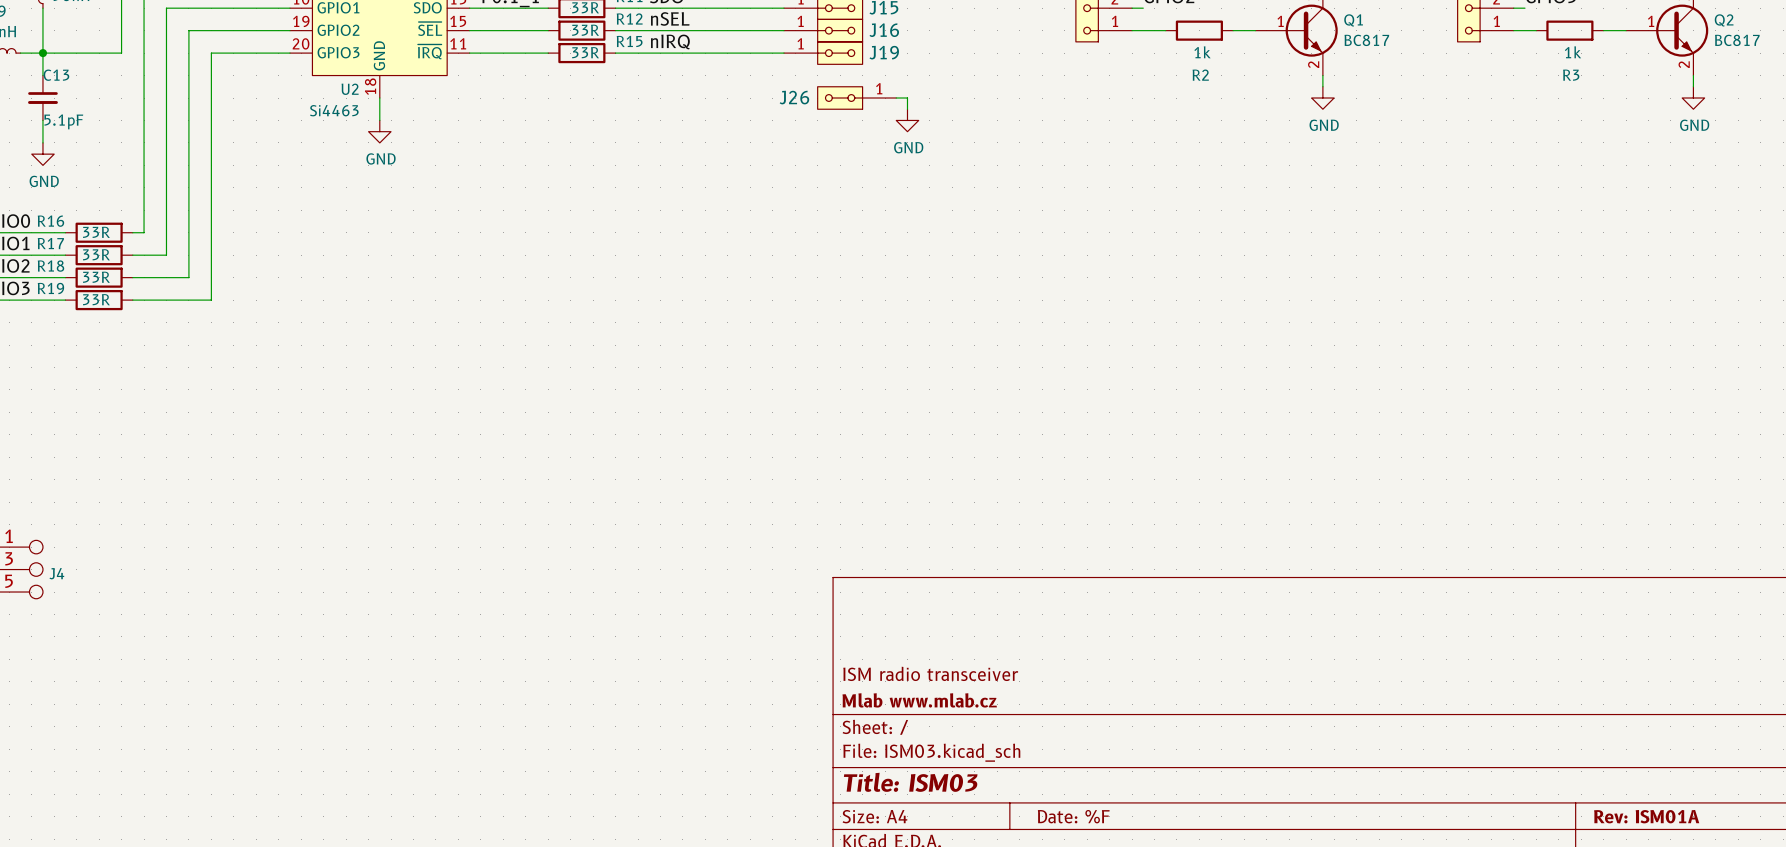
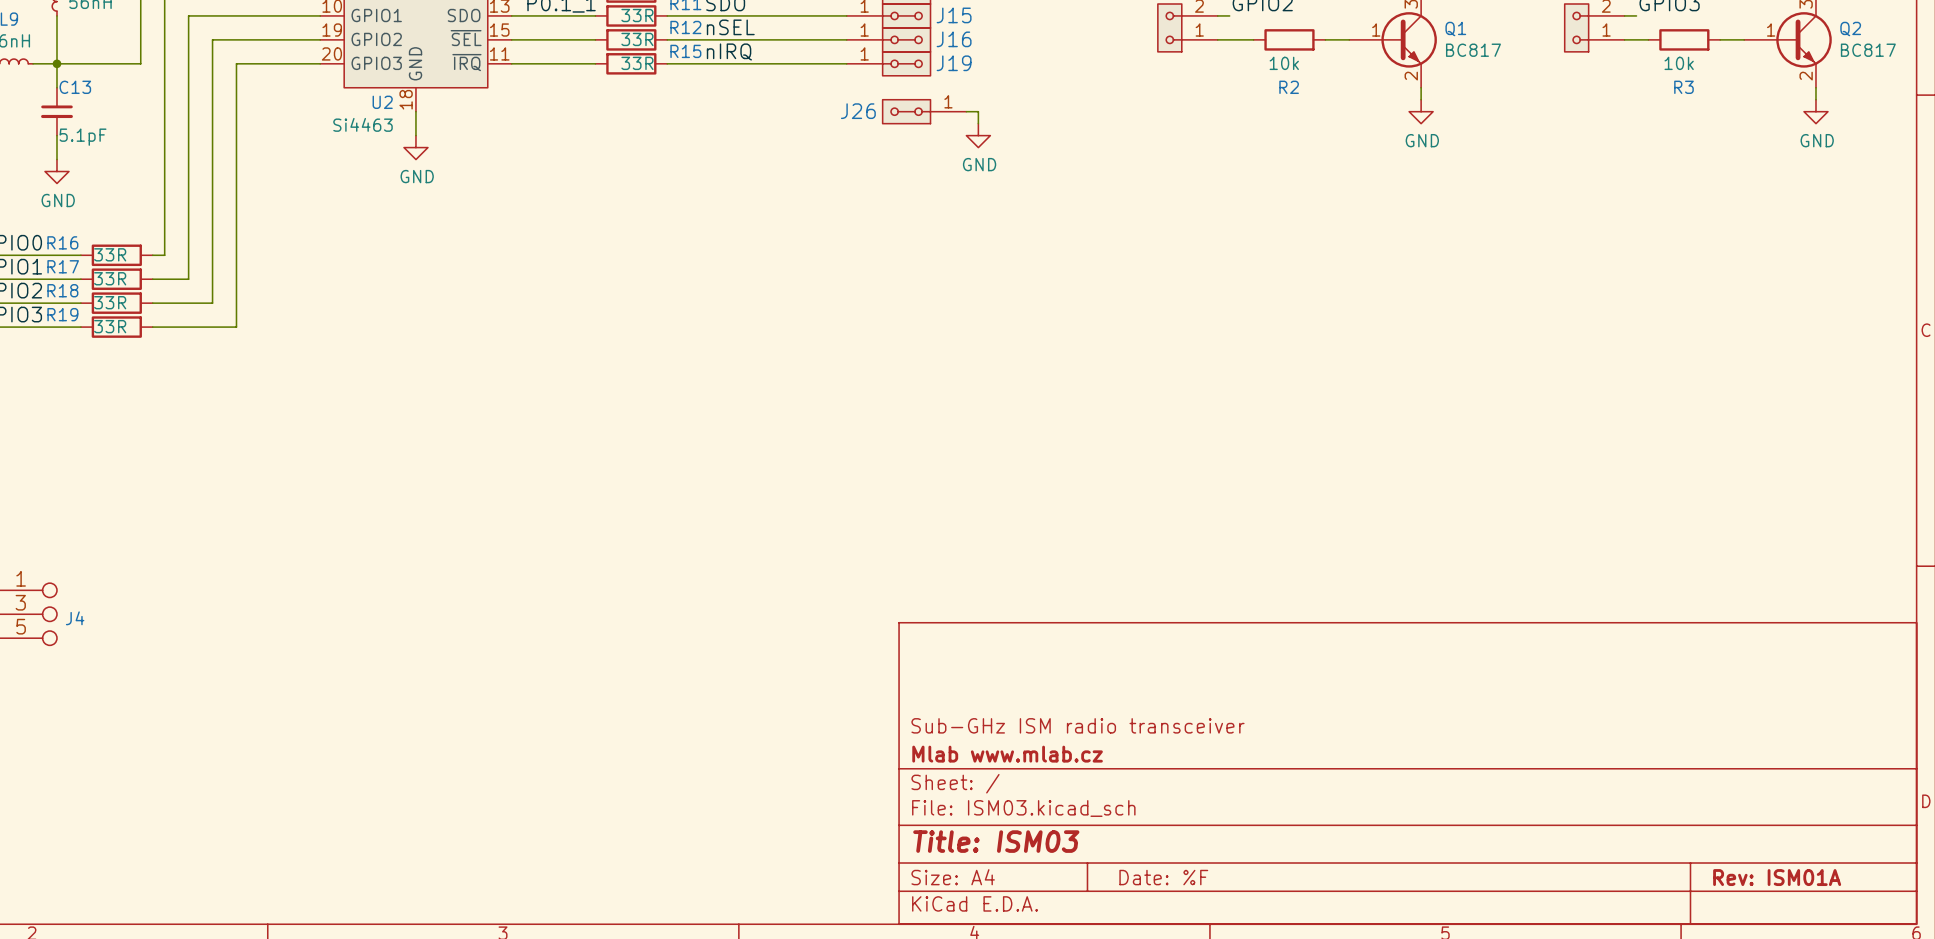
R2 value: 1k (1202, 52) -> 10k (1284, 63)
R3 value: 1k (1573, 52) -> 10k (1679, 63)
title block: ISM radio transceiver (930, 673) -> Sub-GHz ISM radio transceiver (1077, 725)

